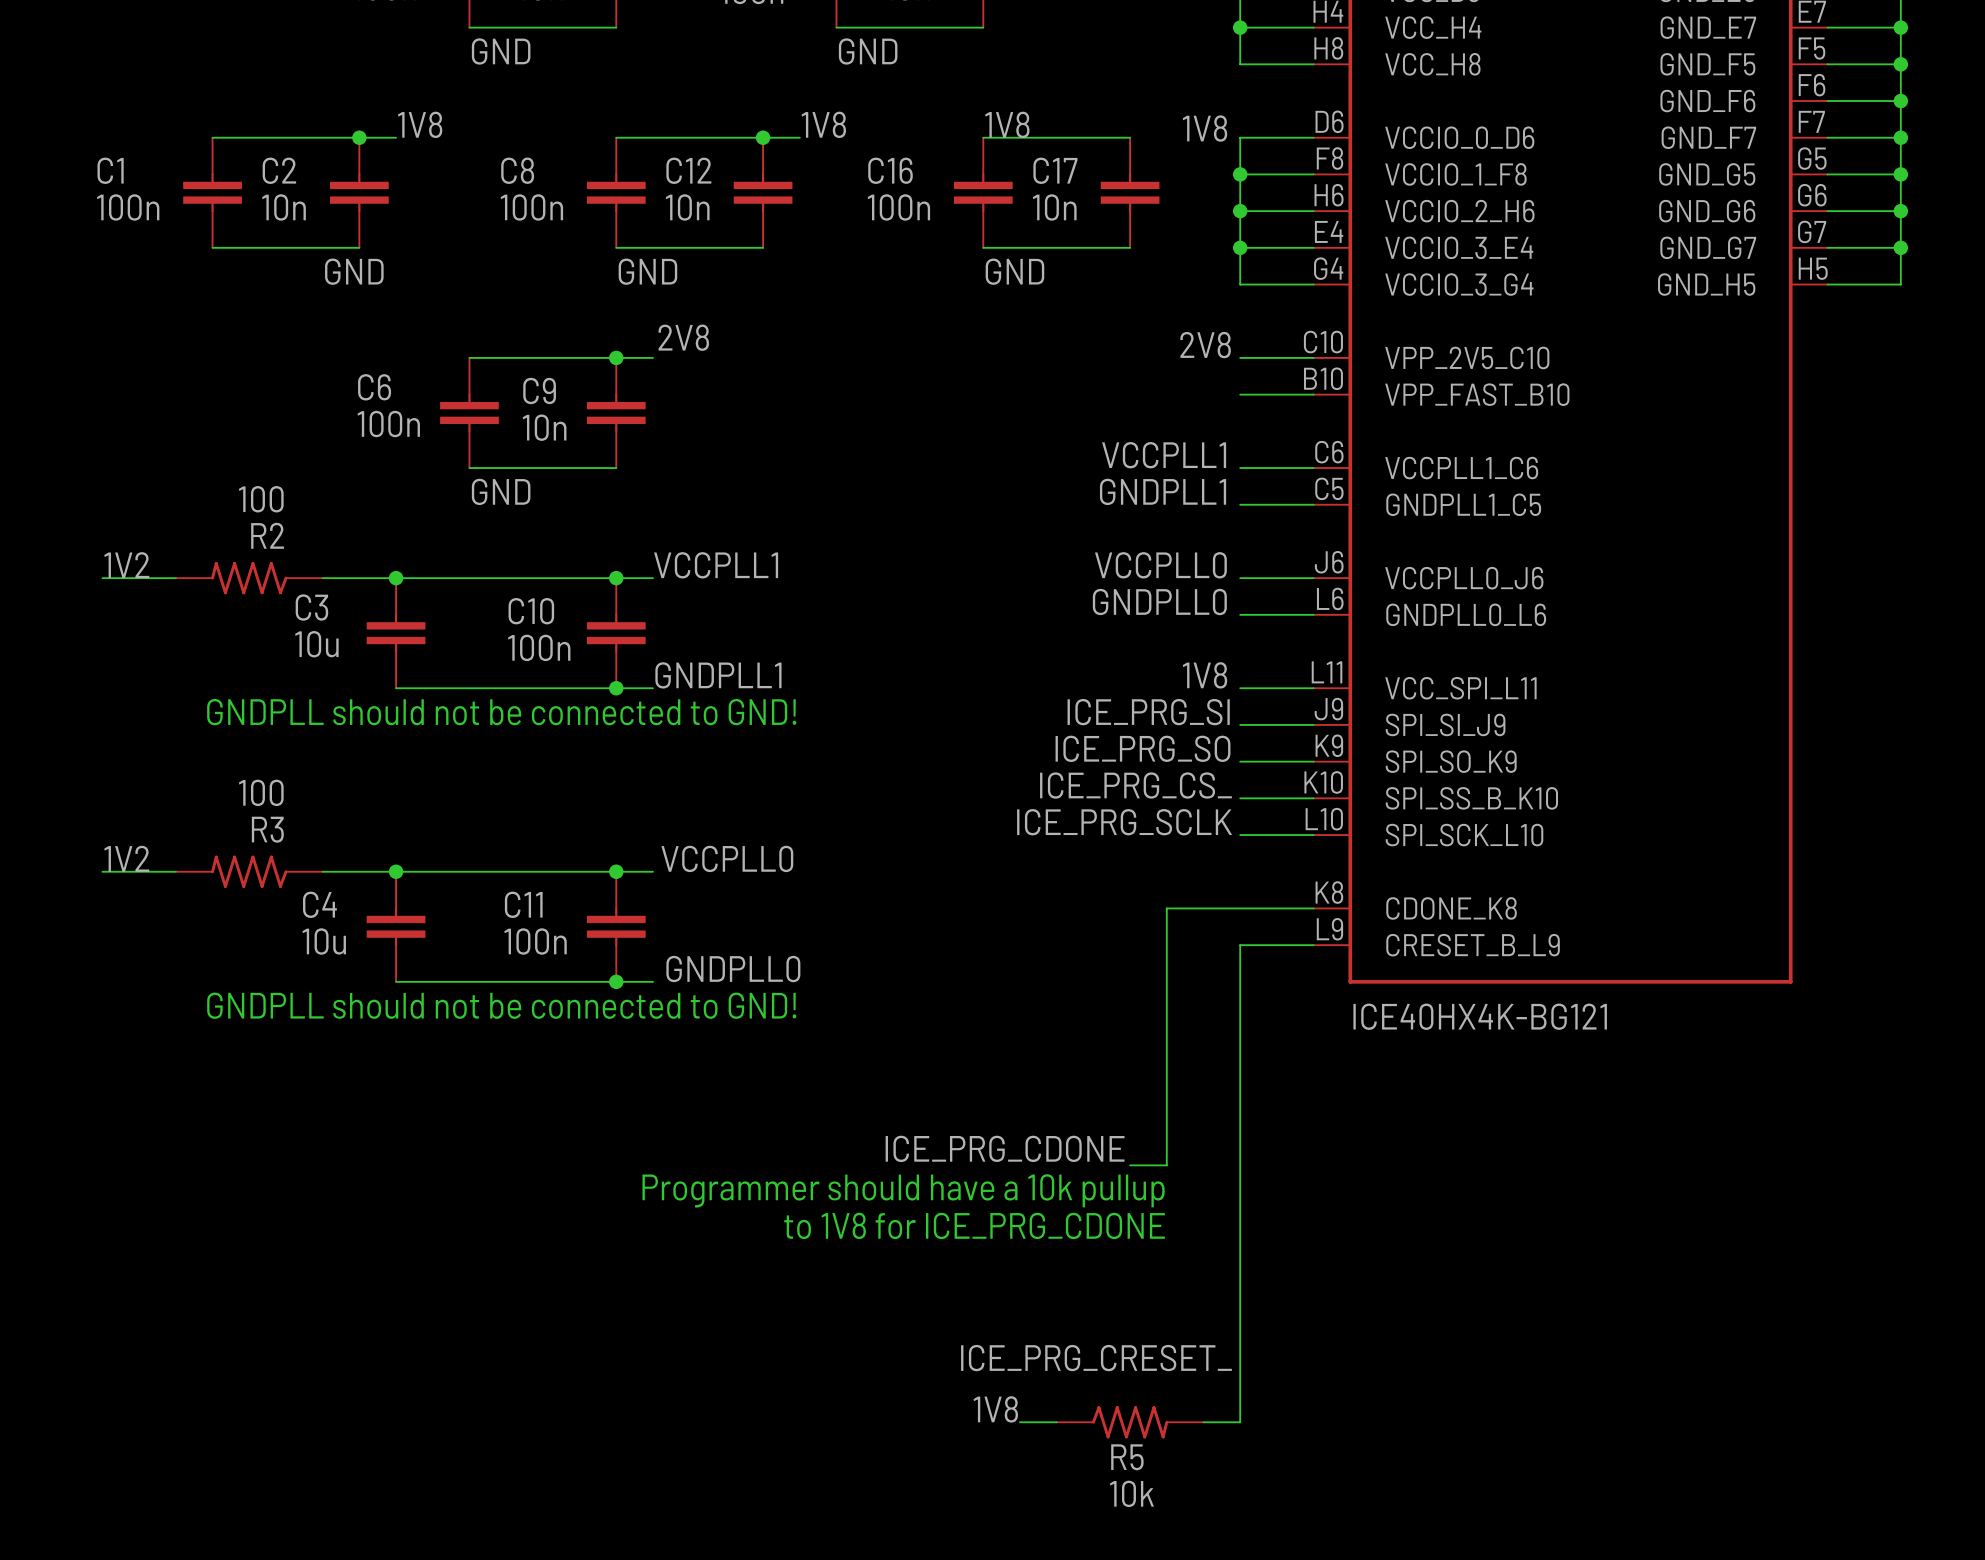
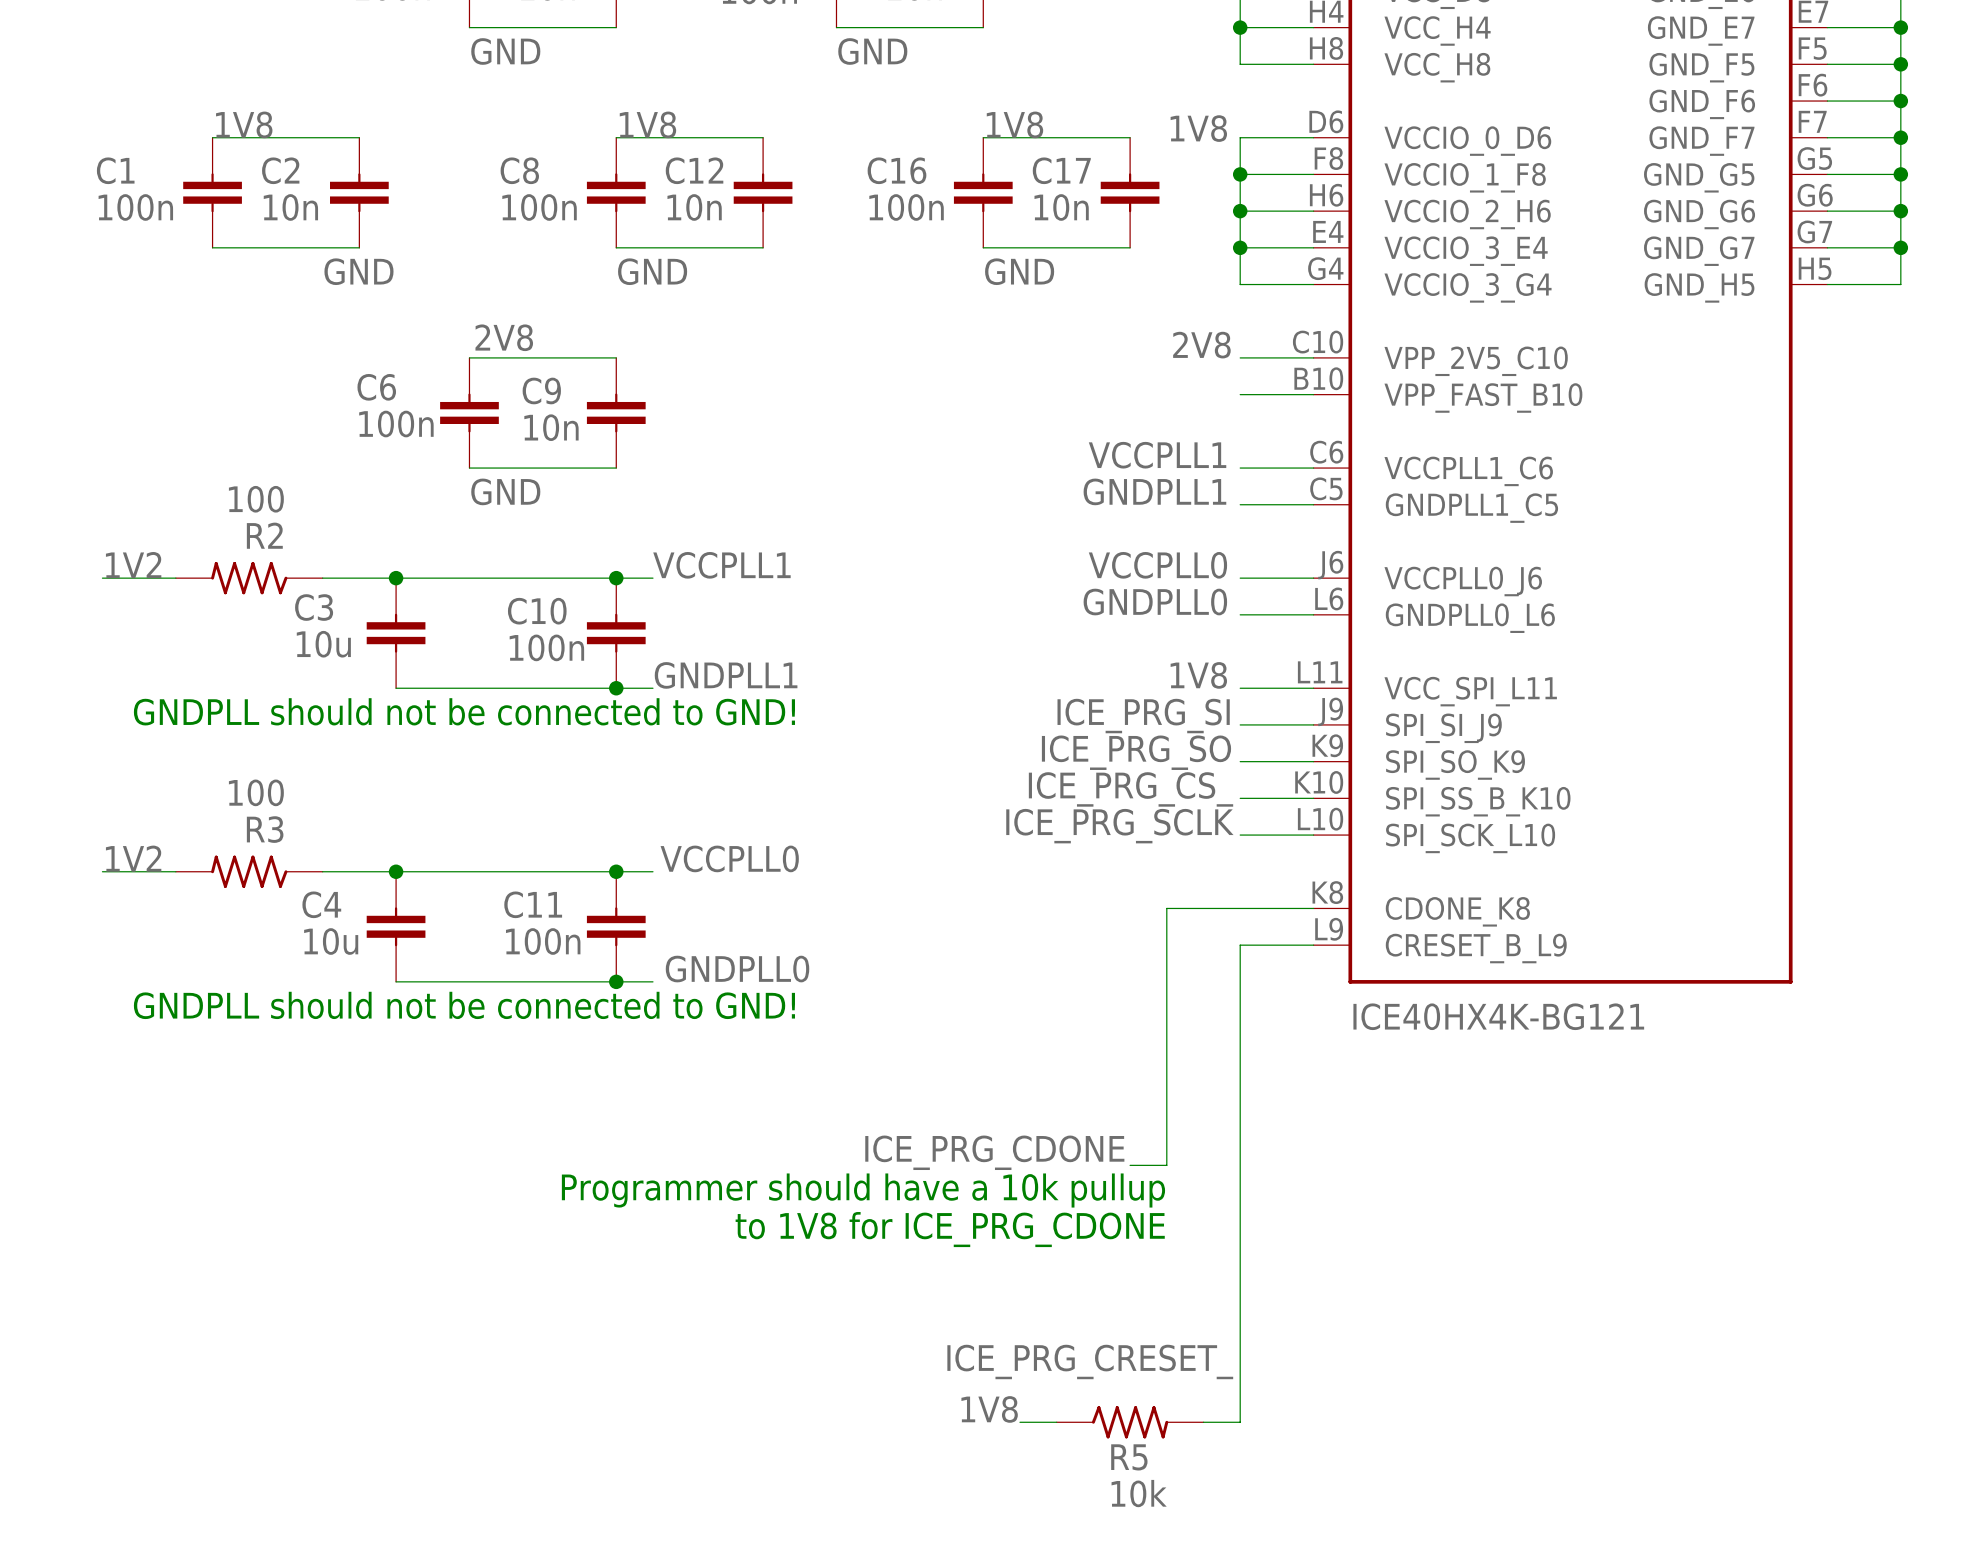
label: none -> 1V8 (244, 124)
label: 1V8 (420, 124) -> none
label: none -> 1V8 (647, 124)
label: 1V8 (823, 124) -> none
wire: (359, 137) (396, 137) -> none
junction: (359, 137) -> none
wire: (763, 137) (799, 137) -> none
junction: (763, 137) -> none
label position: 2V8 (683, 337) -> 2V8 (504, 337)
wire: (616, 357) (652, 357) -> none
junction: (616, 357) -> none

